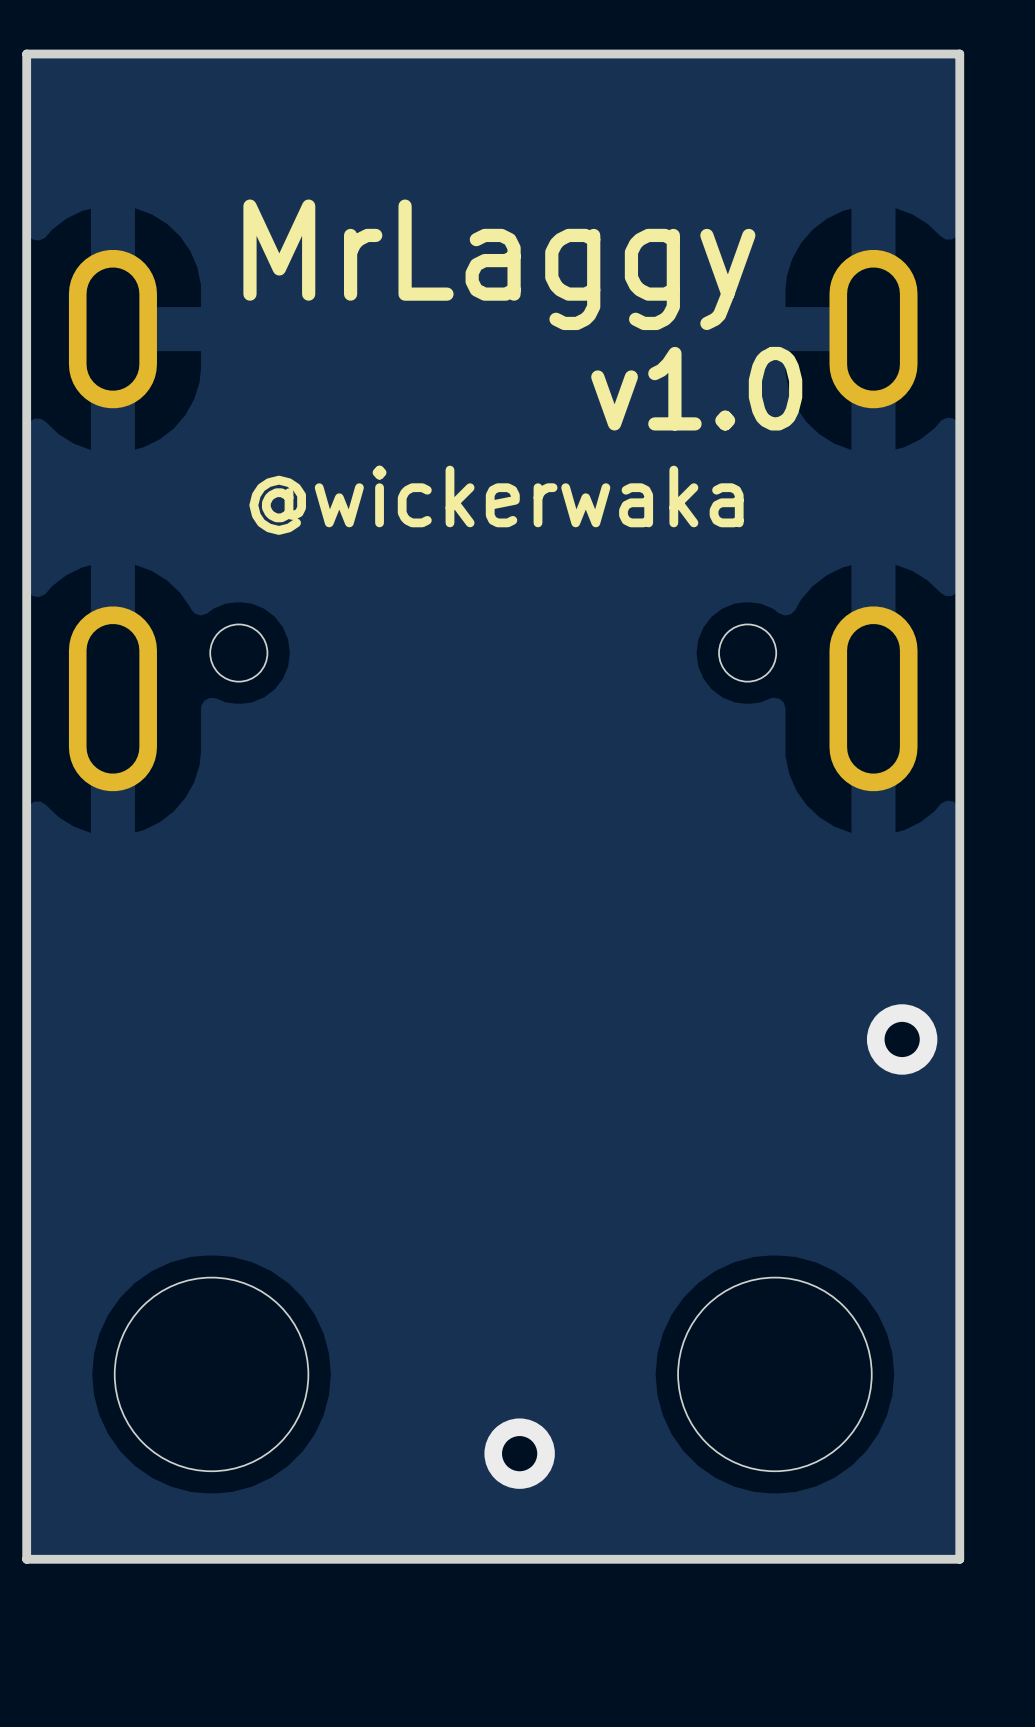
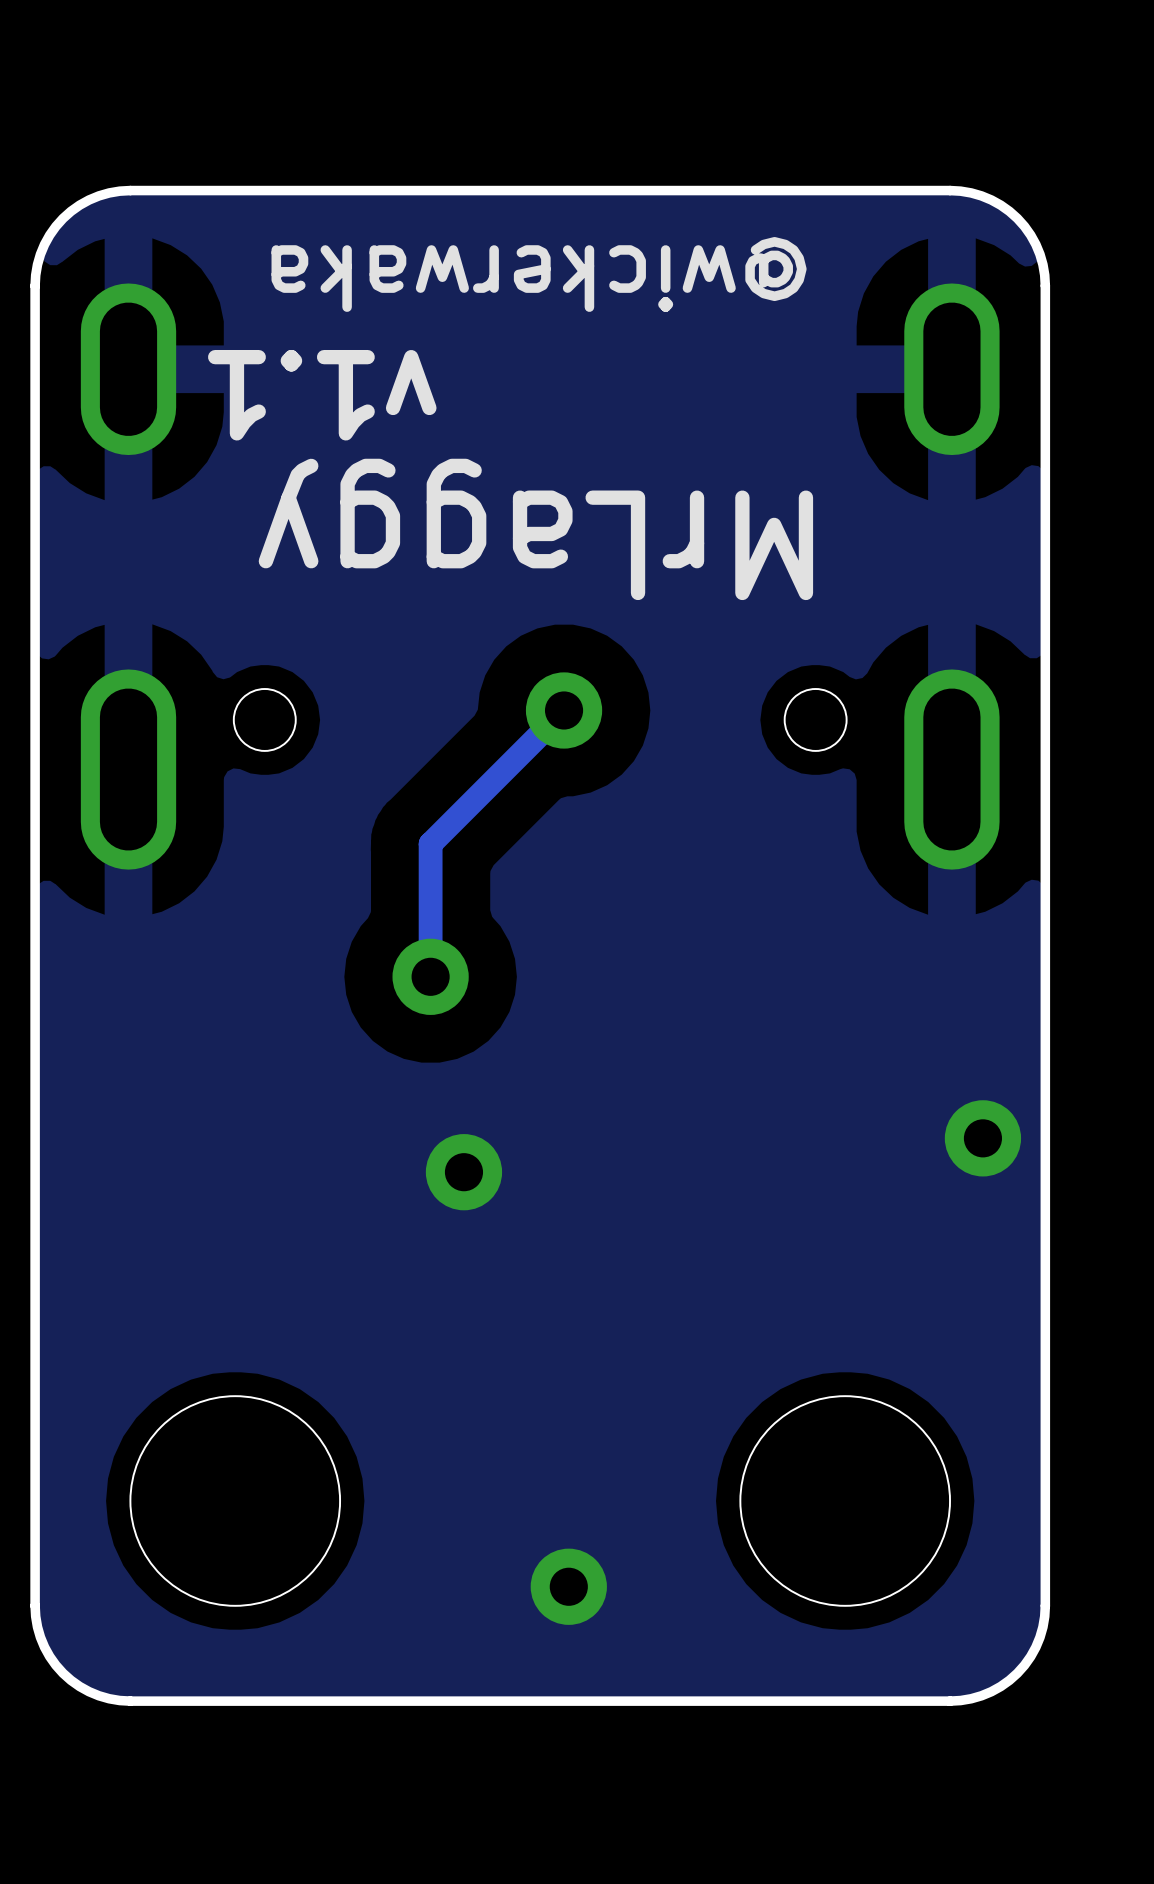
board edge: (959, 252) (959, 54) (26, 54) (26, 252) -> (1045, 285) (1039, 254) (1030, 235) (1017, 218) (1000, 205) (981, 195) (950, 190) (119, 191) (89, 199) (63, 218) (44, 244) (37, 264) (35, 285)
text rotation: 0° (499, 264) -> 180° (535, 529)
text: none -> v1.1 (322, 395)
text: v1.0 (696, 388) -> none
text rotation: 0° (496, 500) -> 180° (539, 274)
track: none -> (564, 710) (430, 843) (430, 976)
via: none -> (564, 710)
via: none -> (430, 976)
via: none -> (463, 1172)
board edge: (26, 1471) (26, 1559) (114, 1559) -> (35, 1605) (37, 1627) (44, 1647) (63, 1673) (89, 1691) (109, 1698) (130, 1701)
board edge: (959, 1471) (959, 1559) (871, 1559) -> (1045, 1605) (1042, 1627) (1035, 1647) (1017, 1673) (991, 1691) (971, 1698) (950, 1701)

